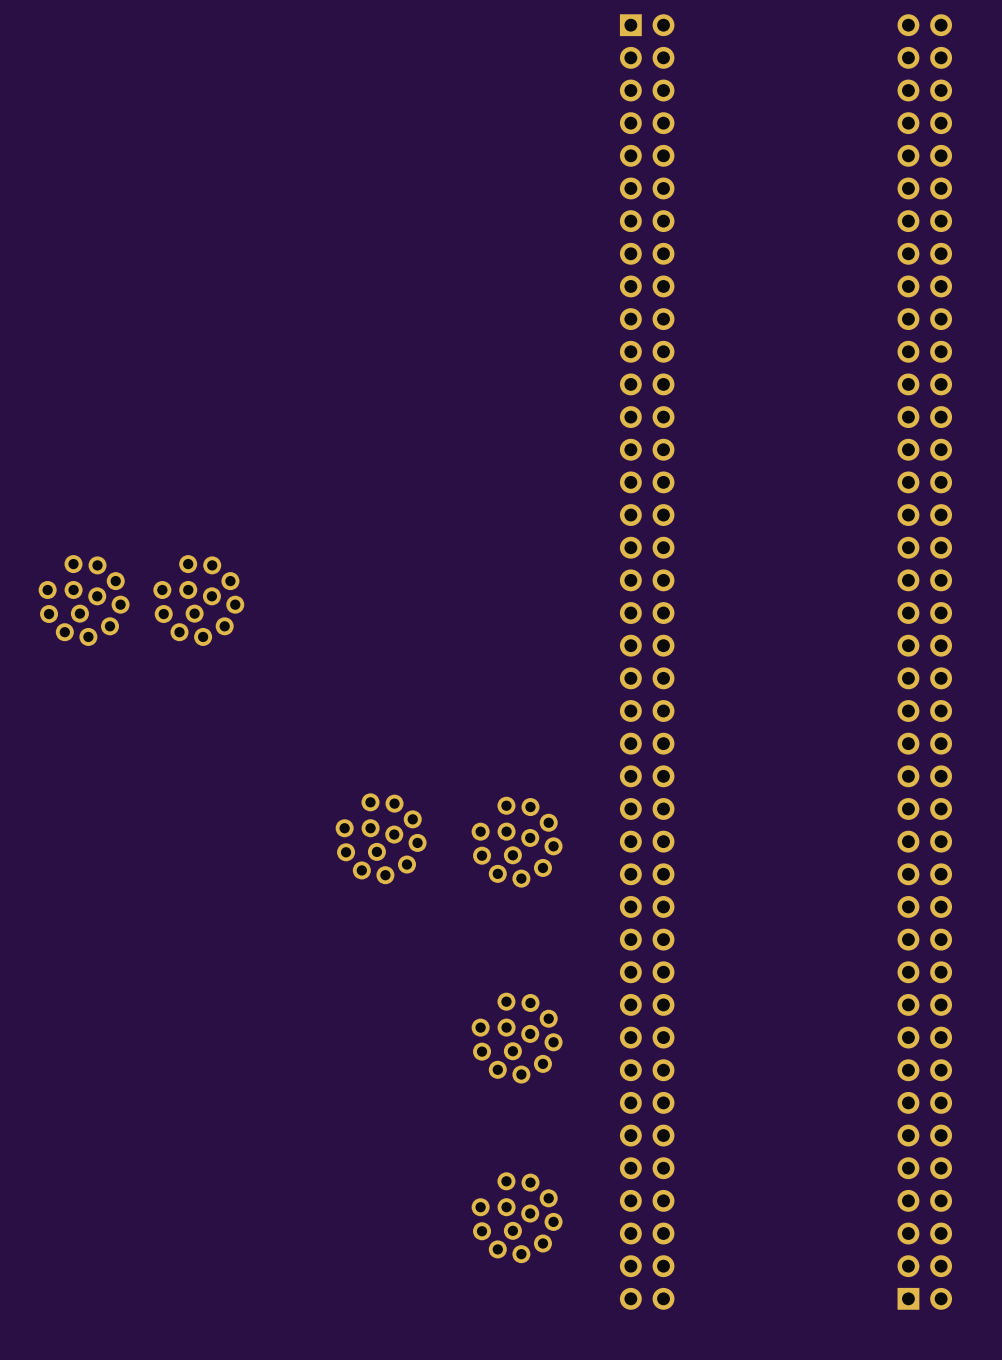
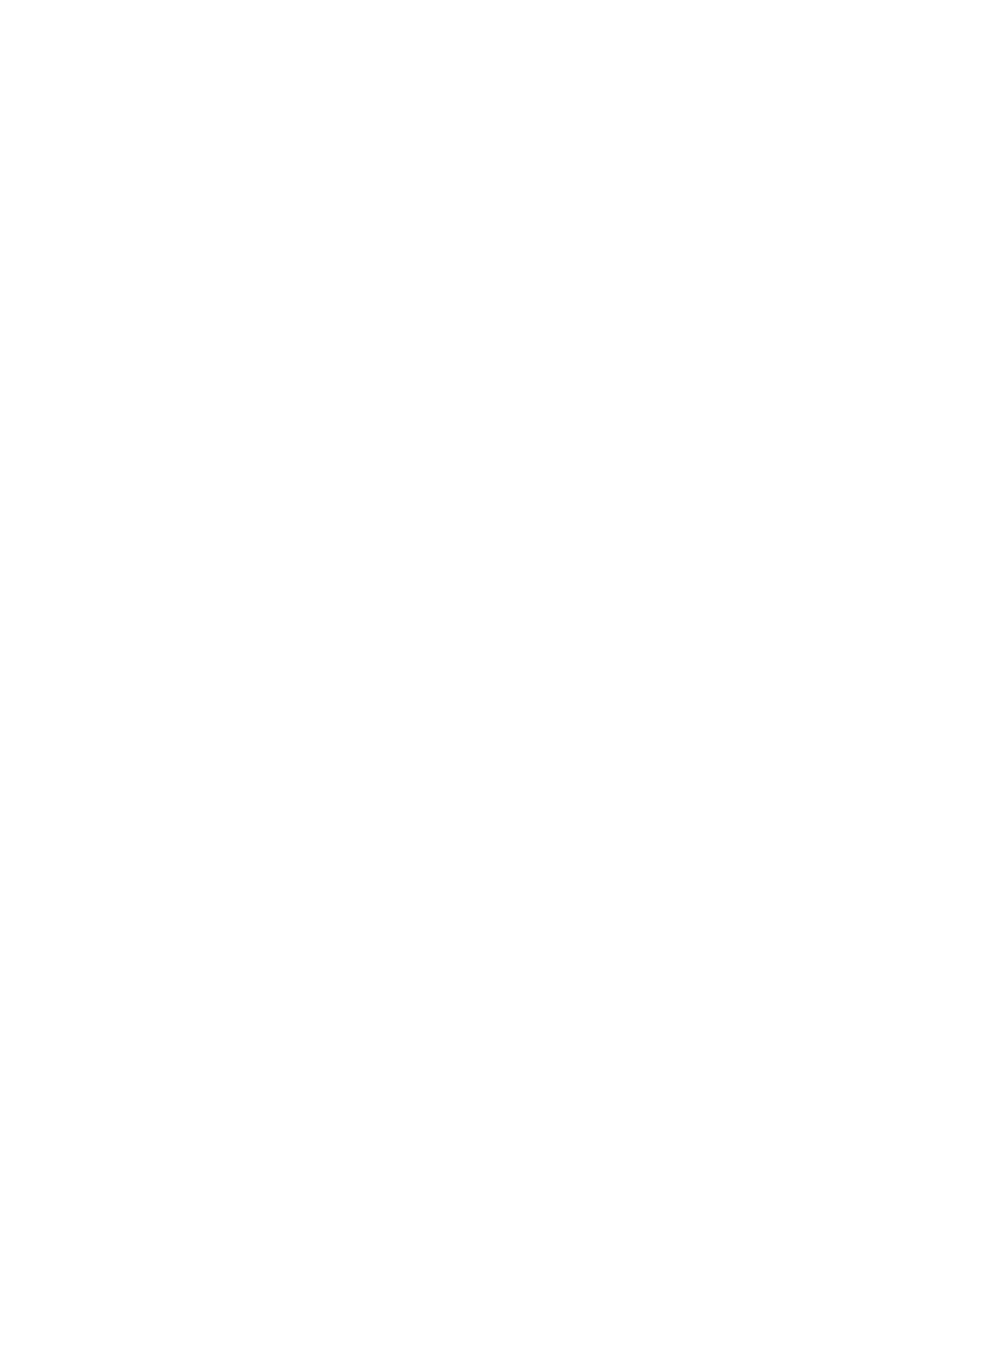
part: (84, 600) -> none
part: (198, 600) -> none
part: (647, 662) -> none
part: (924, 662) -> none
part: (381, 838) -> none
part: (517, 842) -> none
part: (517, 1038) -> none
part: (517, 1217) -> none

